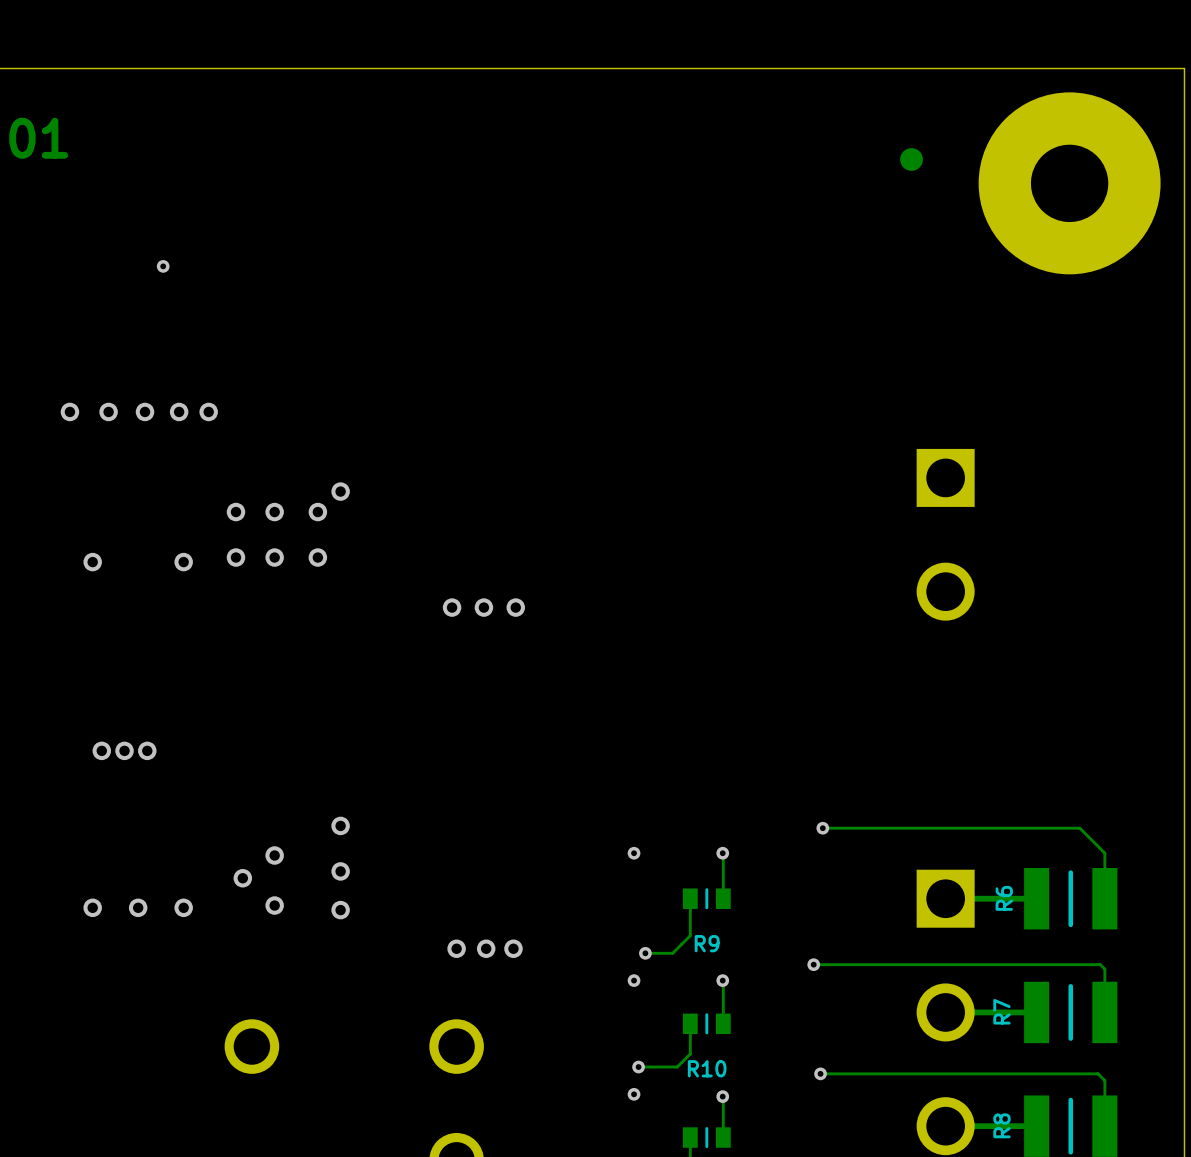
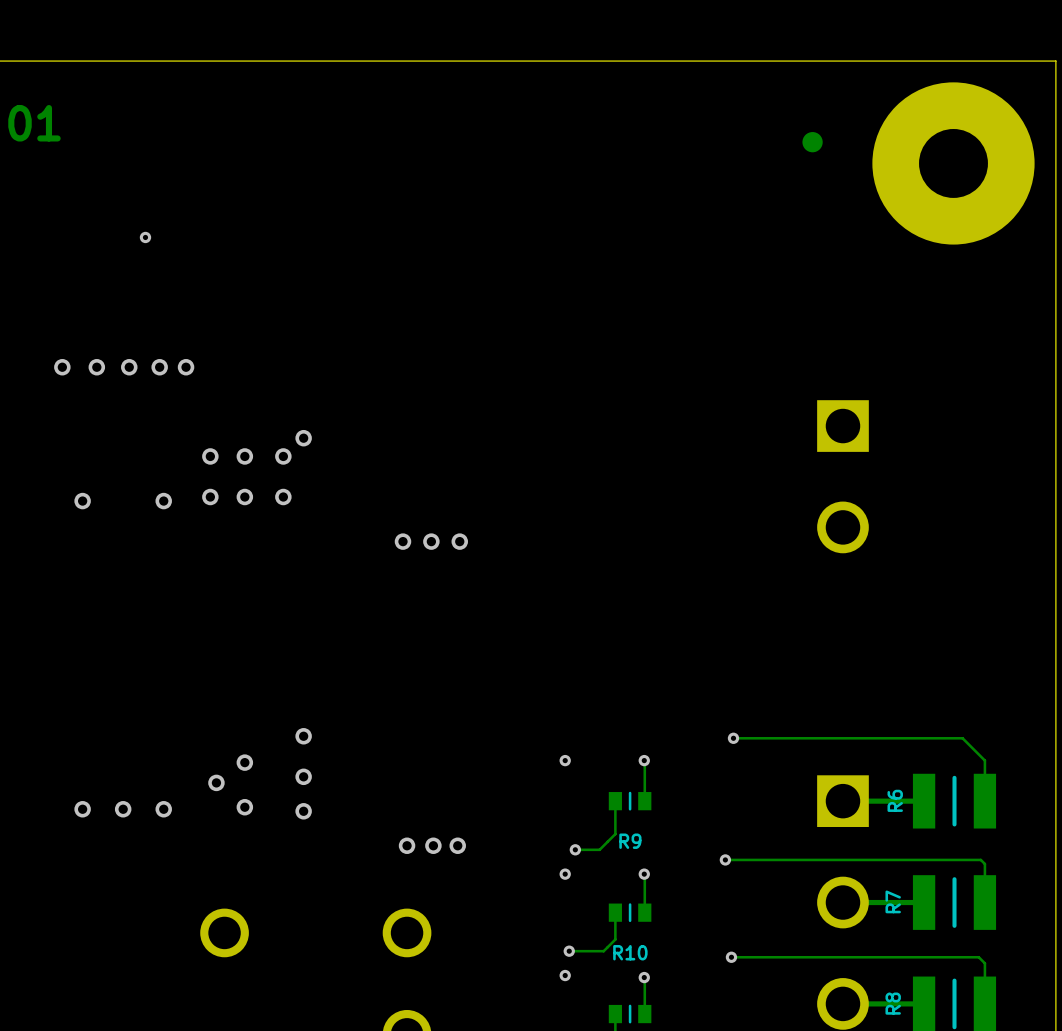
via: (101, 750) -> none
via: (124, 750) -> none
via: (147, 750) -> none

